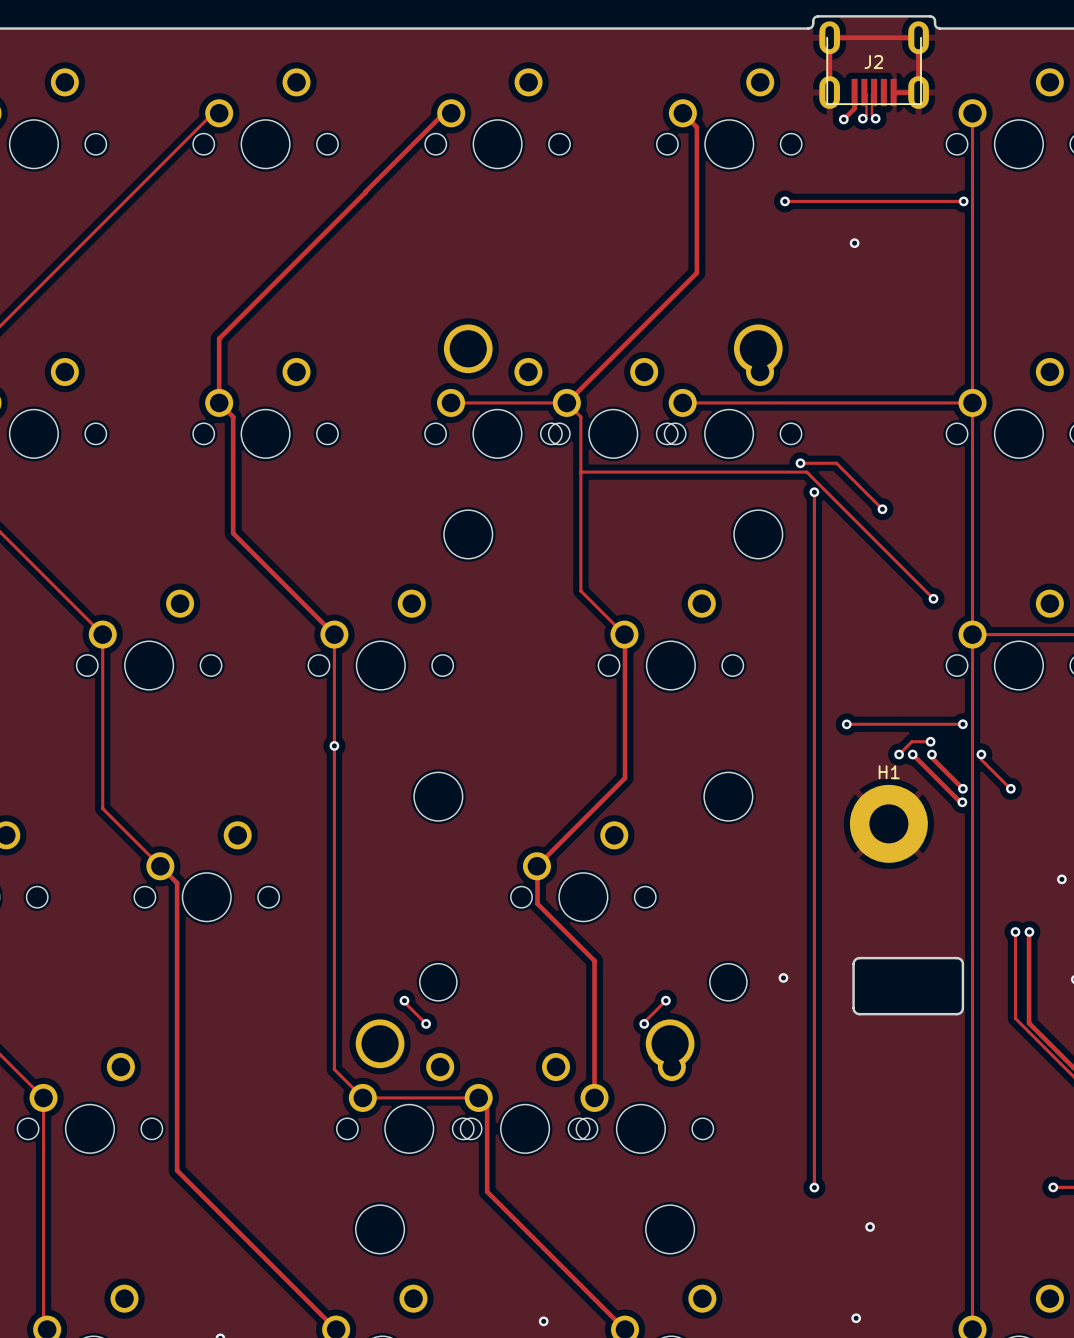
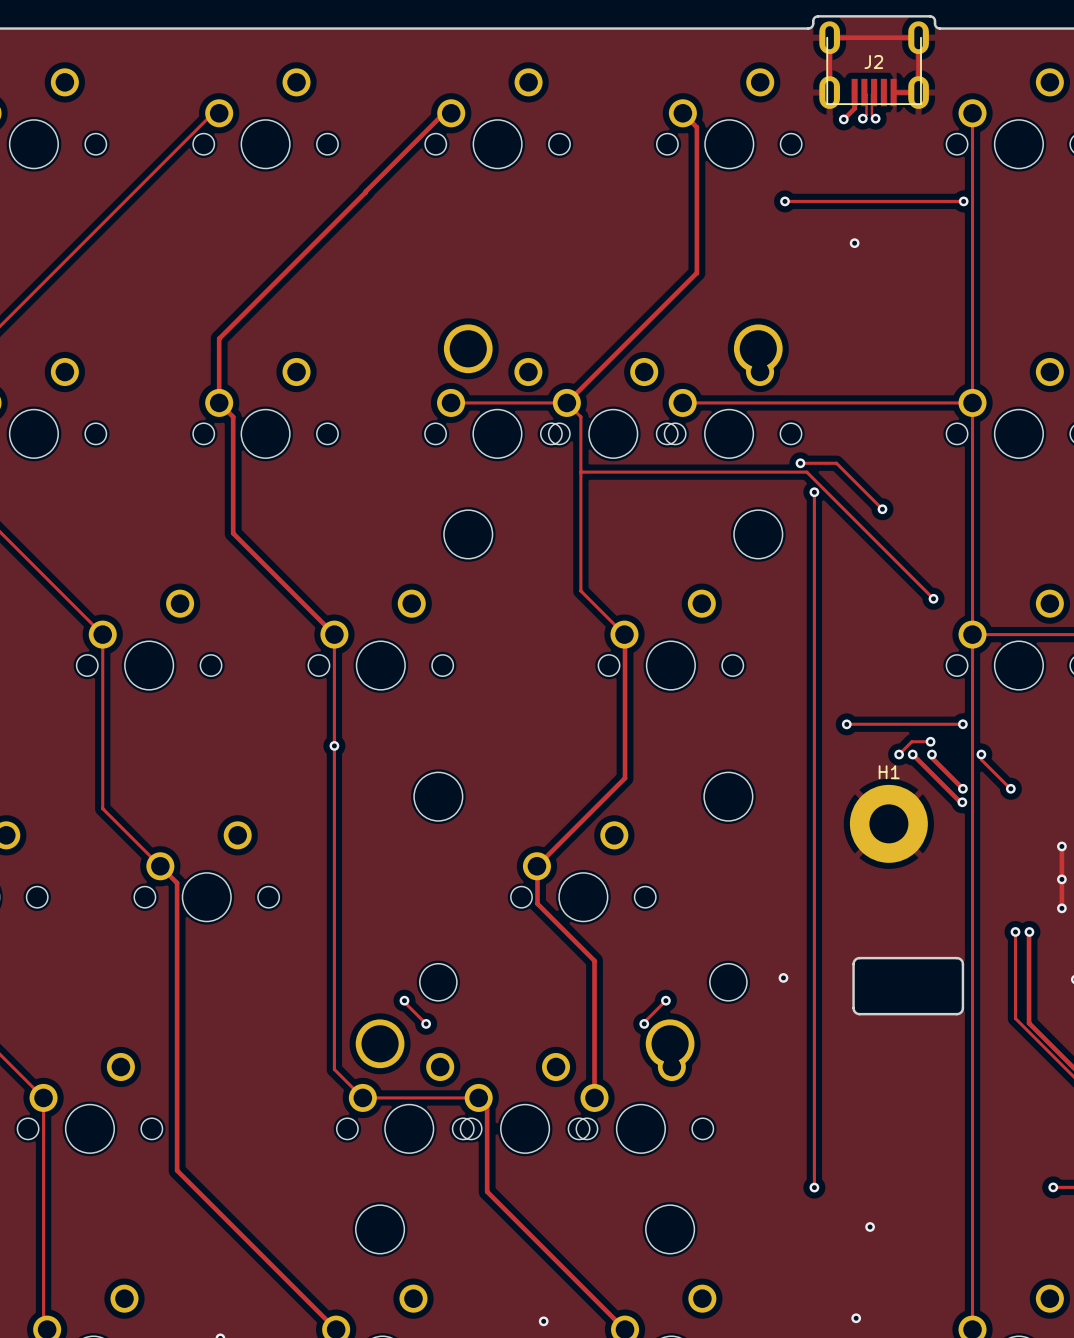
track: none -> (1061, 846) (1061, 908)
via: none -> (1061, 846)
via: none -> (1061, 908)

